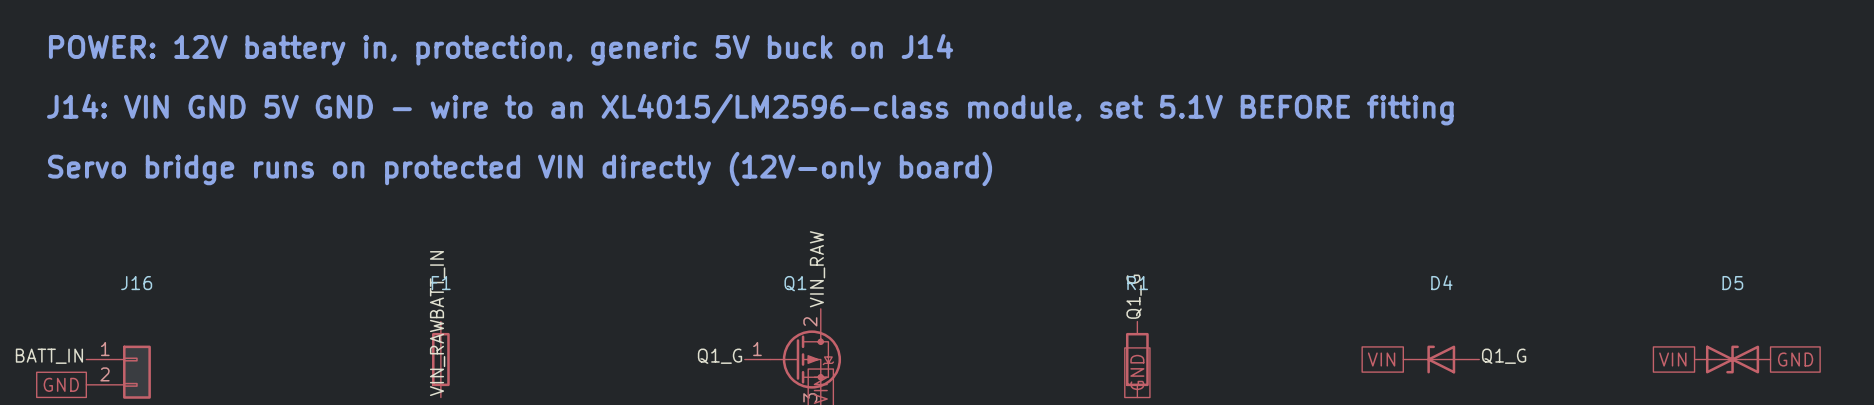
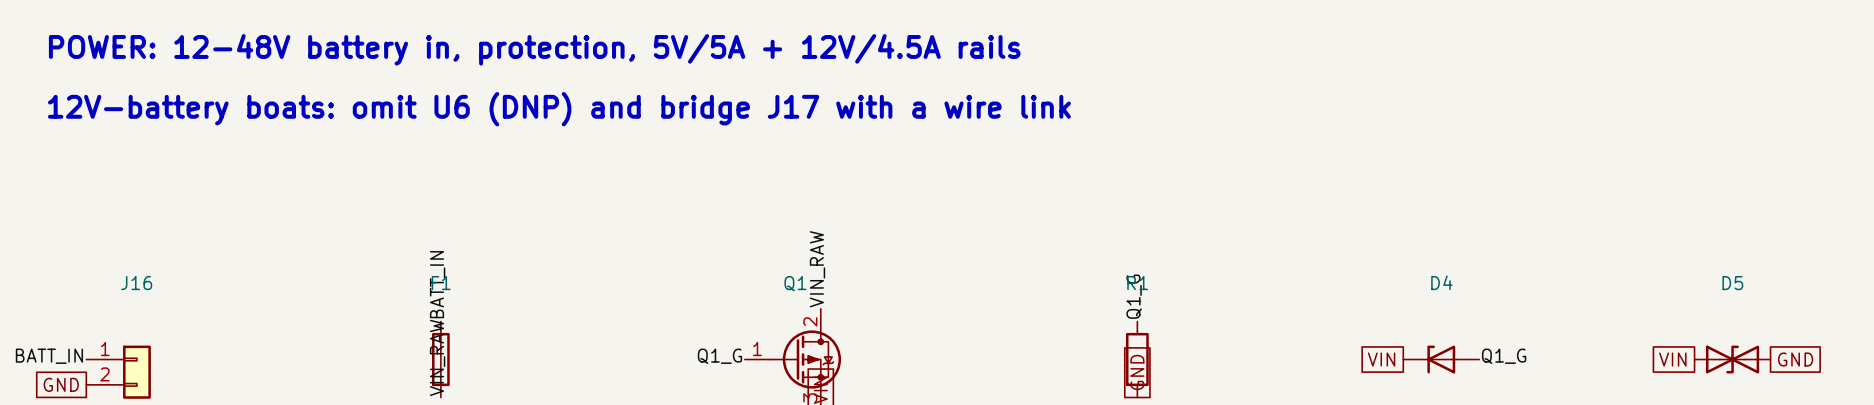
text: POWER: 12V battery in, protection, generic 5V buck on J14 (501, 49) -> POWER: 12-48V battery in, protection, 5V/5A + 12V/4.5A rails (534, 49)
text: J14: VIN GND 5V GND - wire to an XL4015/LM2596-class module, set 5.1V BEFORE fitting (750, 109) -> 12V-battery boats: omit U6 (DNP) and bridge J17 with a wire link (559, 109)
text: Servo bridge runs on protected VIN directly (12V-only board) (520, 169) -> none

